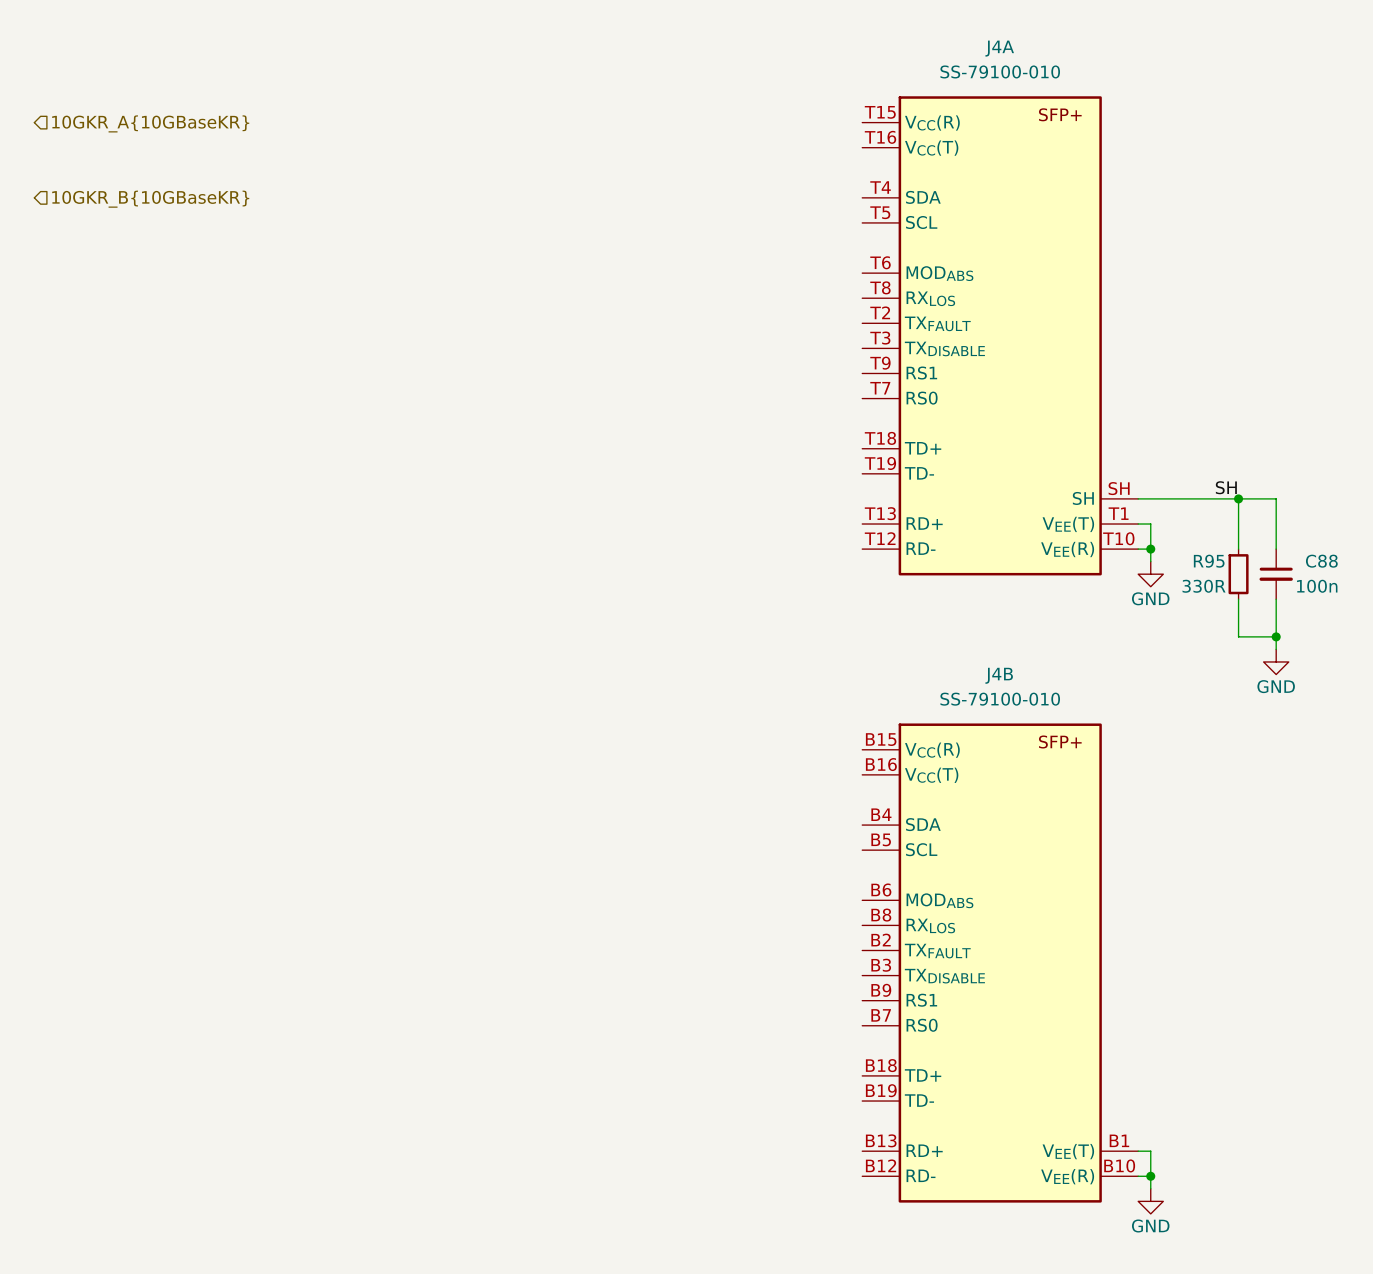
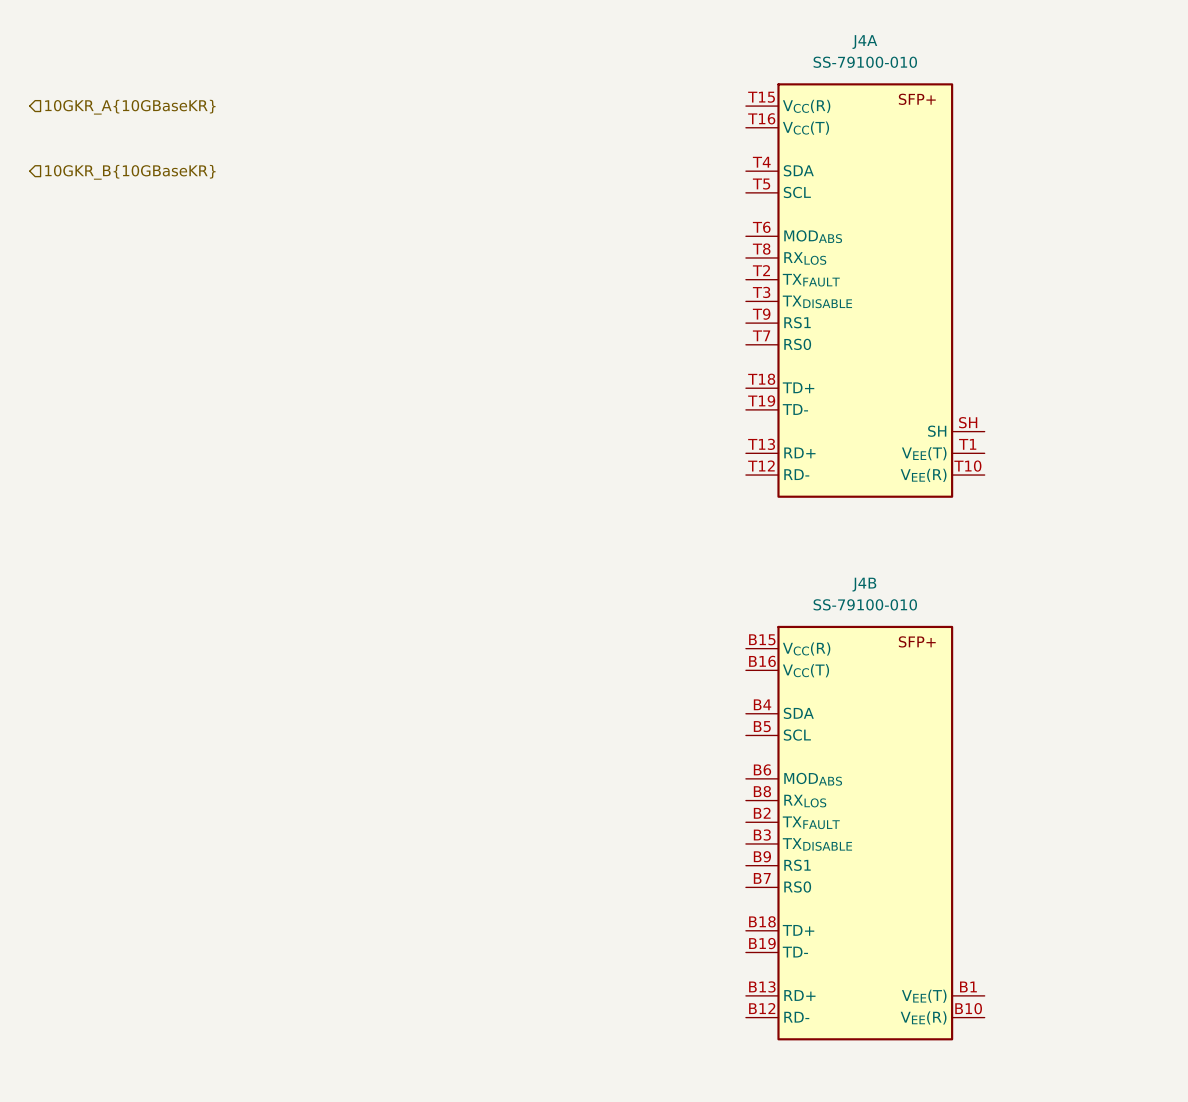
label: SH (1226, 487) -> none
wire: (1138, 498) (1276, 498) (1276, 549) -> none
wire: (1238, 498) (1238, 549) -> none
junction: (1238, 498) -> none
wire: (1138, 524) (1150, 524) (1150, 561) -> none
wire: (1138, 549) (1150, 549) -> none
junction: (1150, 549) -> none
power symbol: GND (1150, 574) -> none
R95: (1238, 574) -> none
C88: (1276, 574) -> none
wire: (1238, 599) (1238, 636) (1276, 636) -> none
wire: (1276, 599) (1276, 649) -> none
junction: (1276, 636) -> none
power symbol: GND (1276, 661) -> none
wire: (1138, 1151) (1150, 1151) (1150, 1188) -> none
wire: (1138, 1176) (1150, 1176) -> none
junction: (1150, 1176) -> none
power symbol: GND (1150, 1201) -> none

